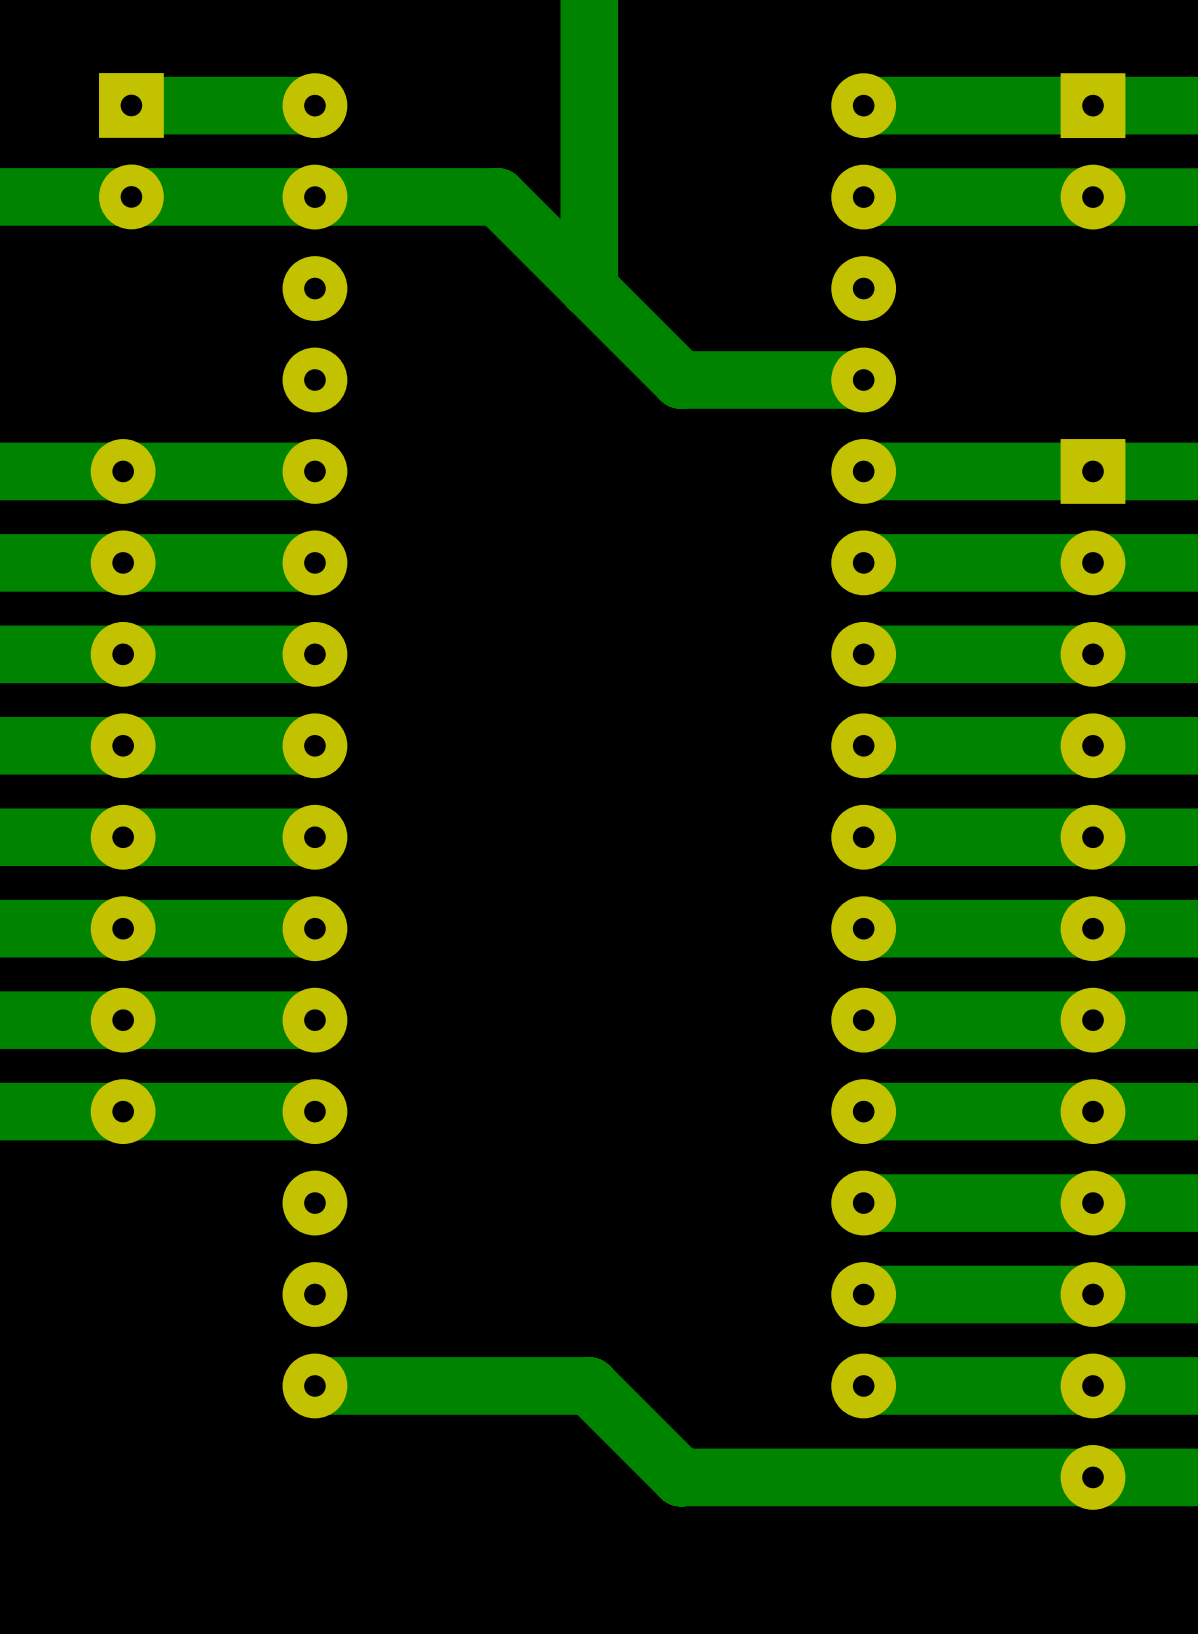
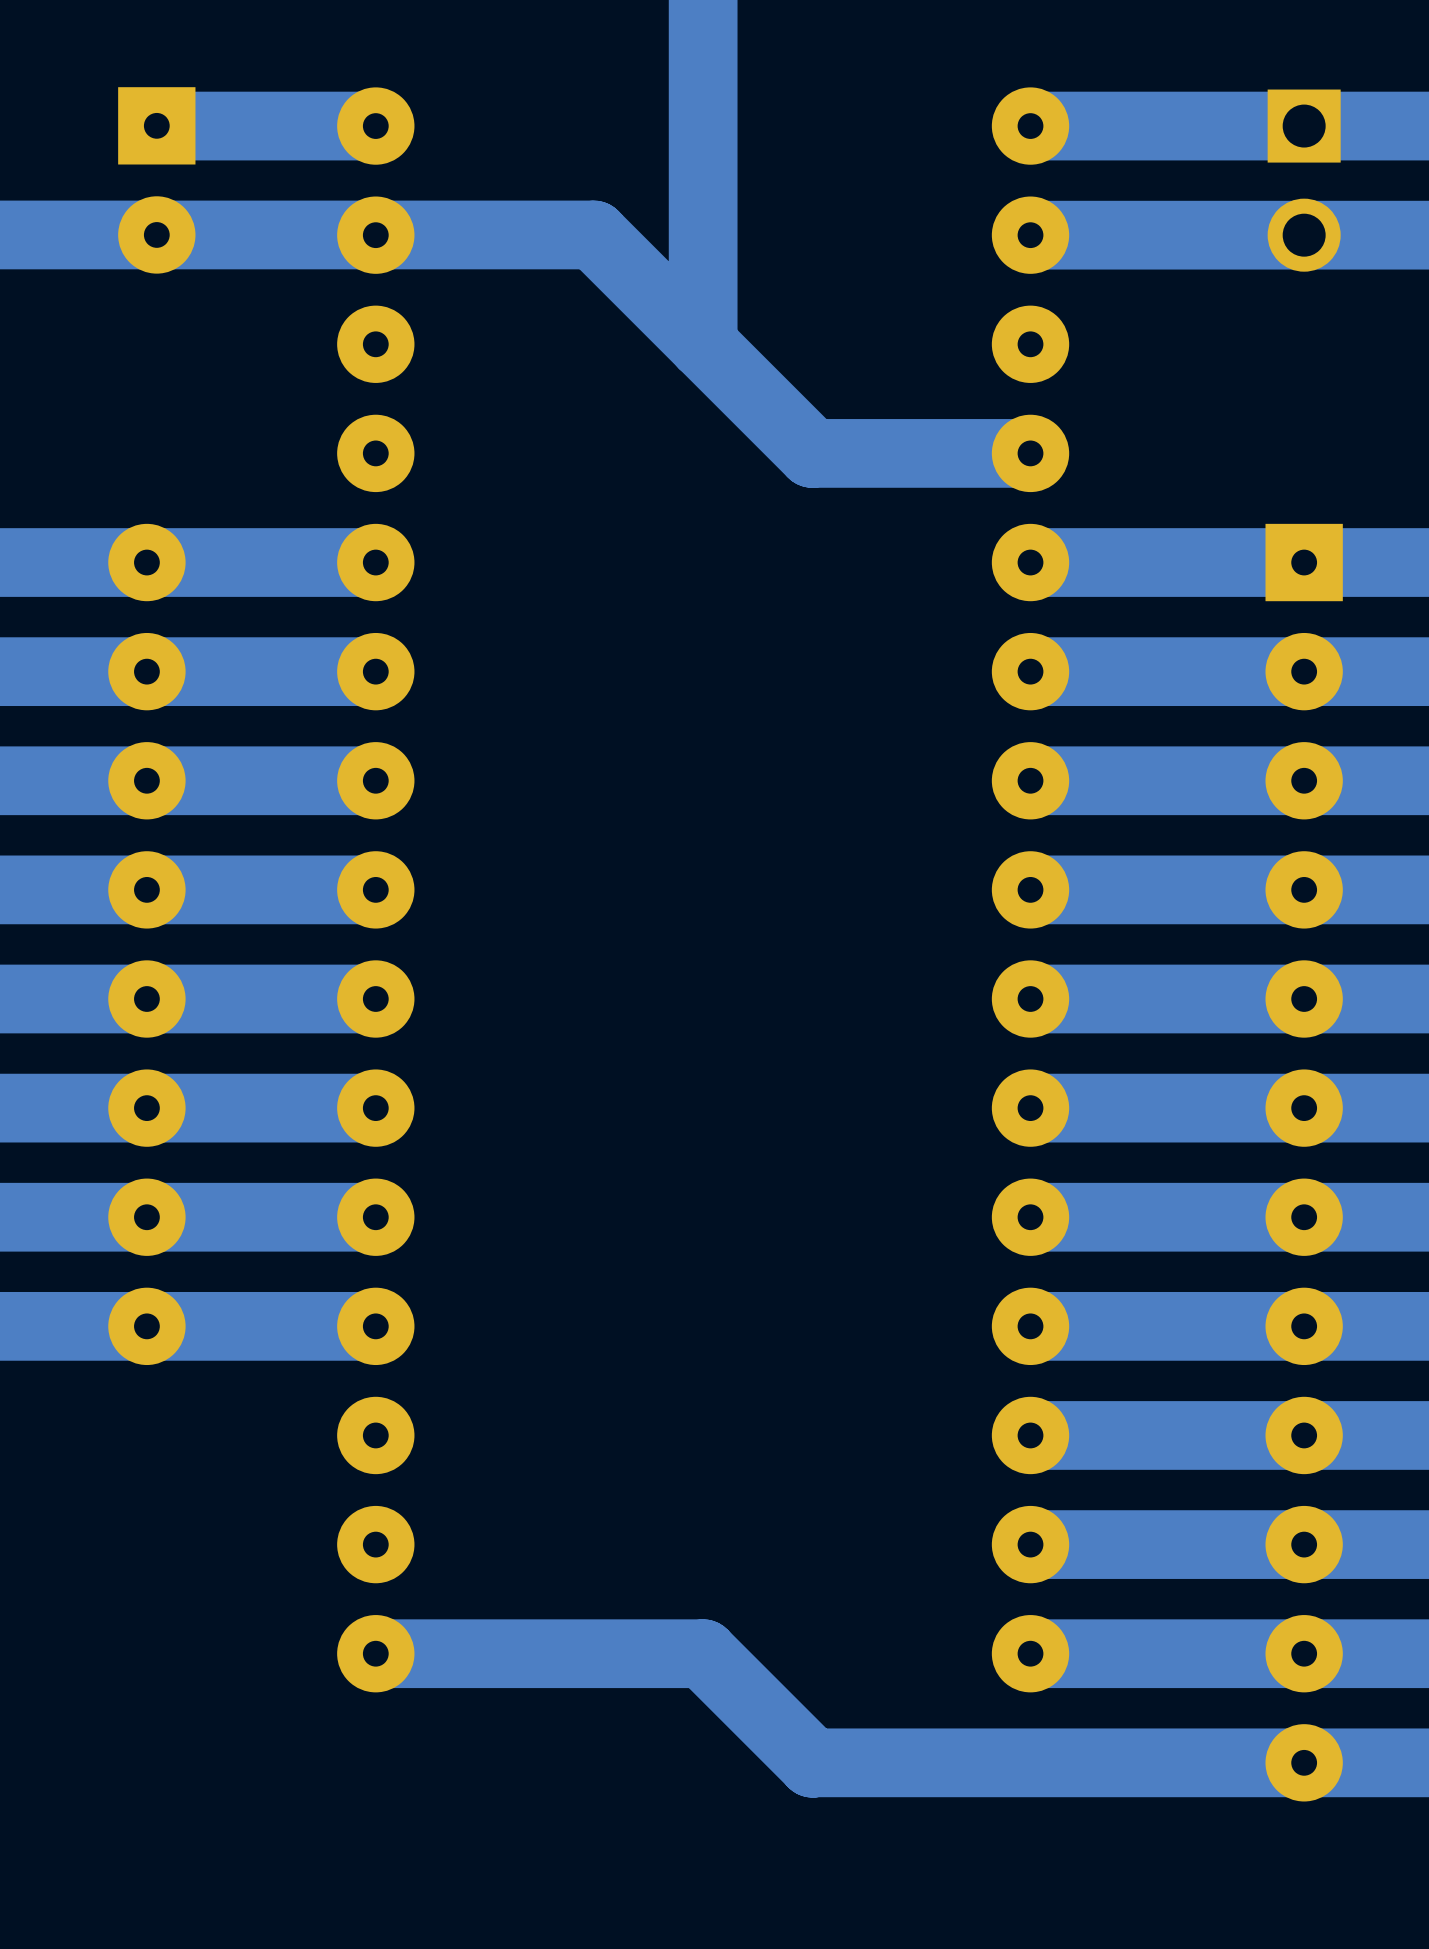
part footprint: [1060, 73, 1126, 230] -> [1267, 89, 1341, 272]

